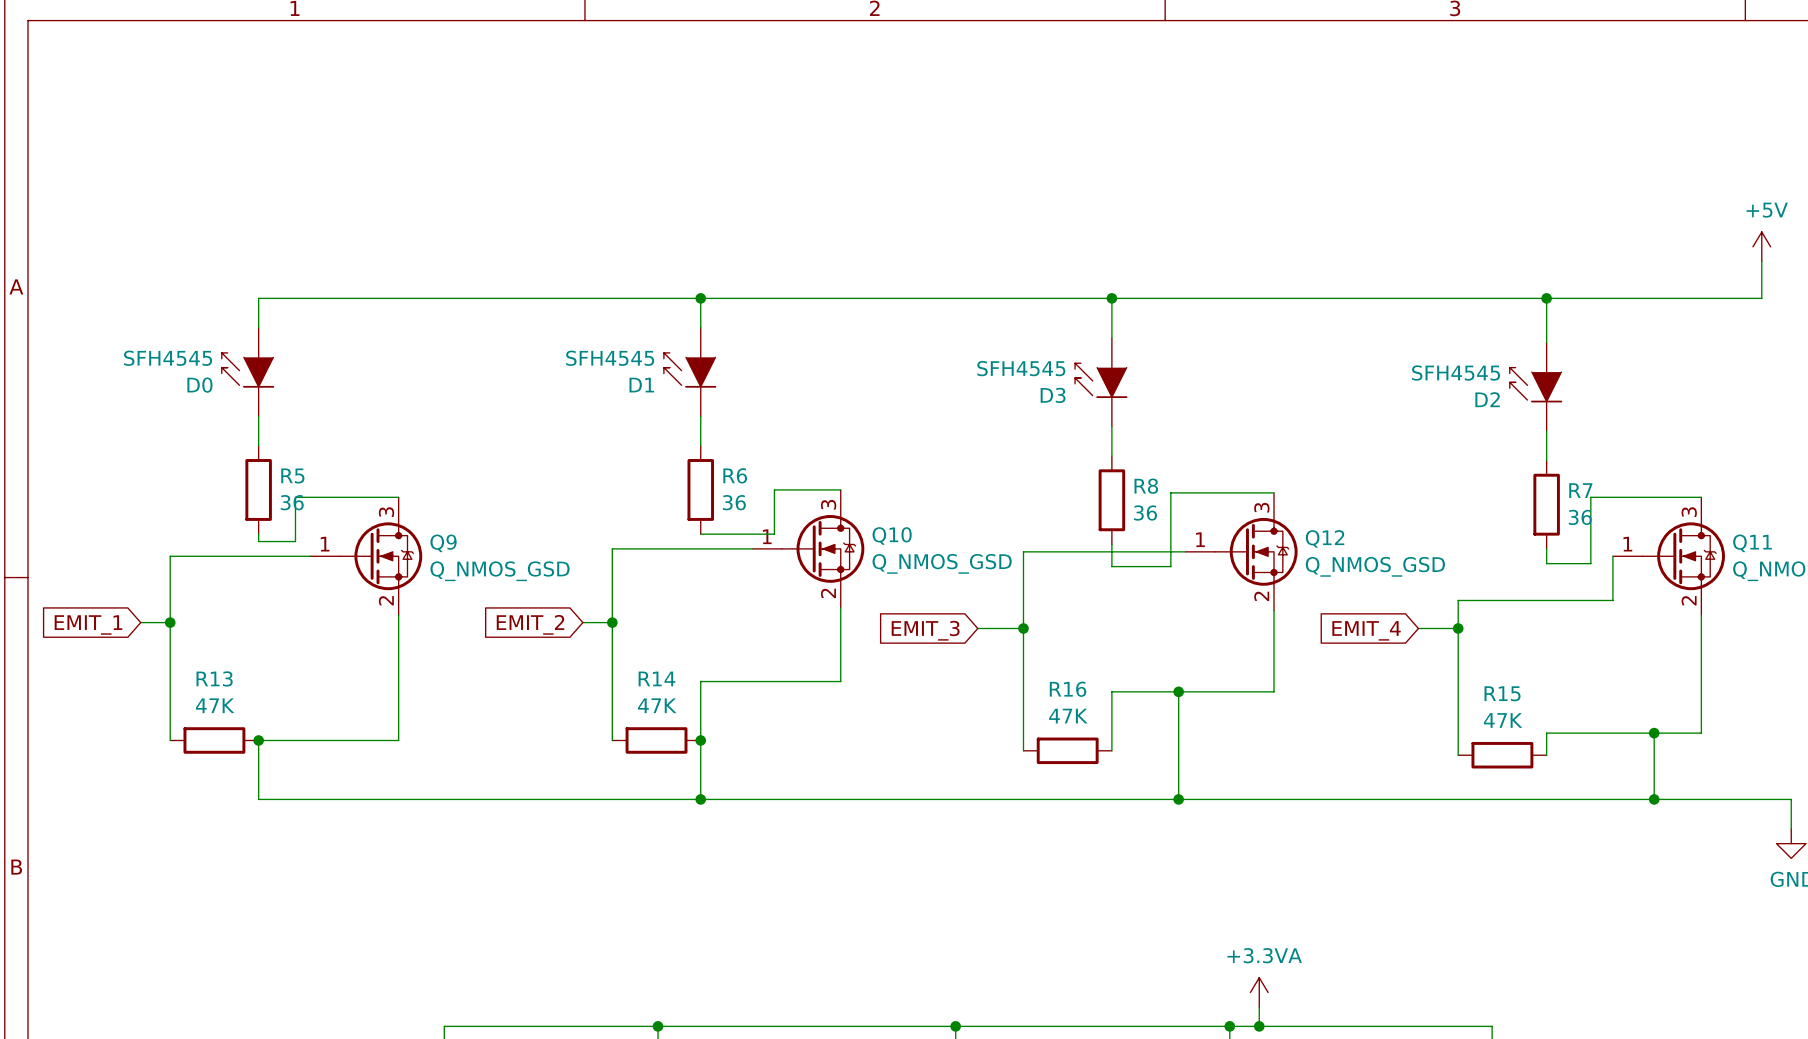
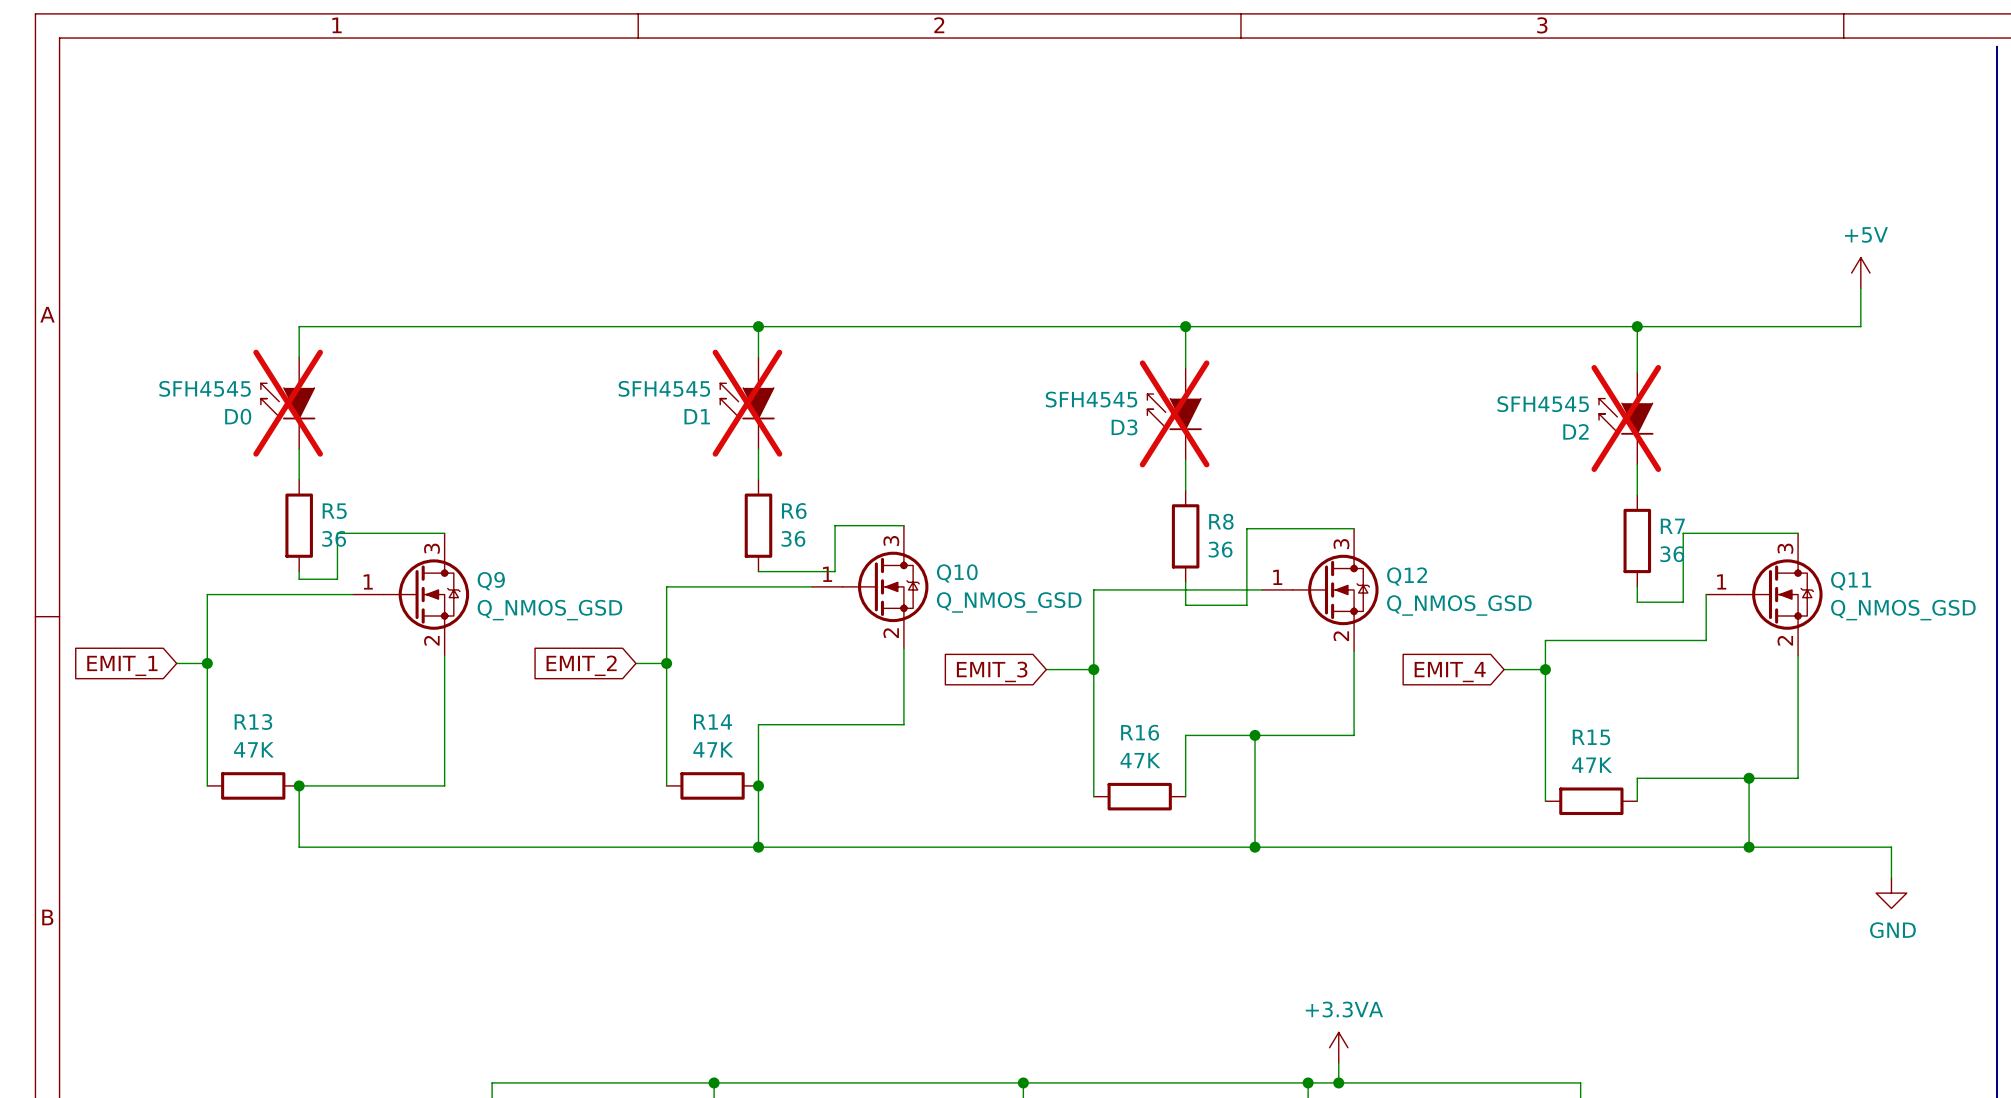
D0 do-not-place cross: none -> (288, 403)
D1 do-not-place cross: none -> (747, 403)
D3 do-not-place cross: none -> (1174, 413)
D2 do-not-place cross: none -> (1626, 418)

